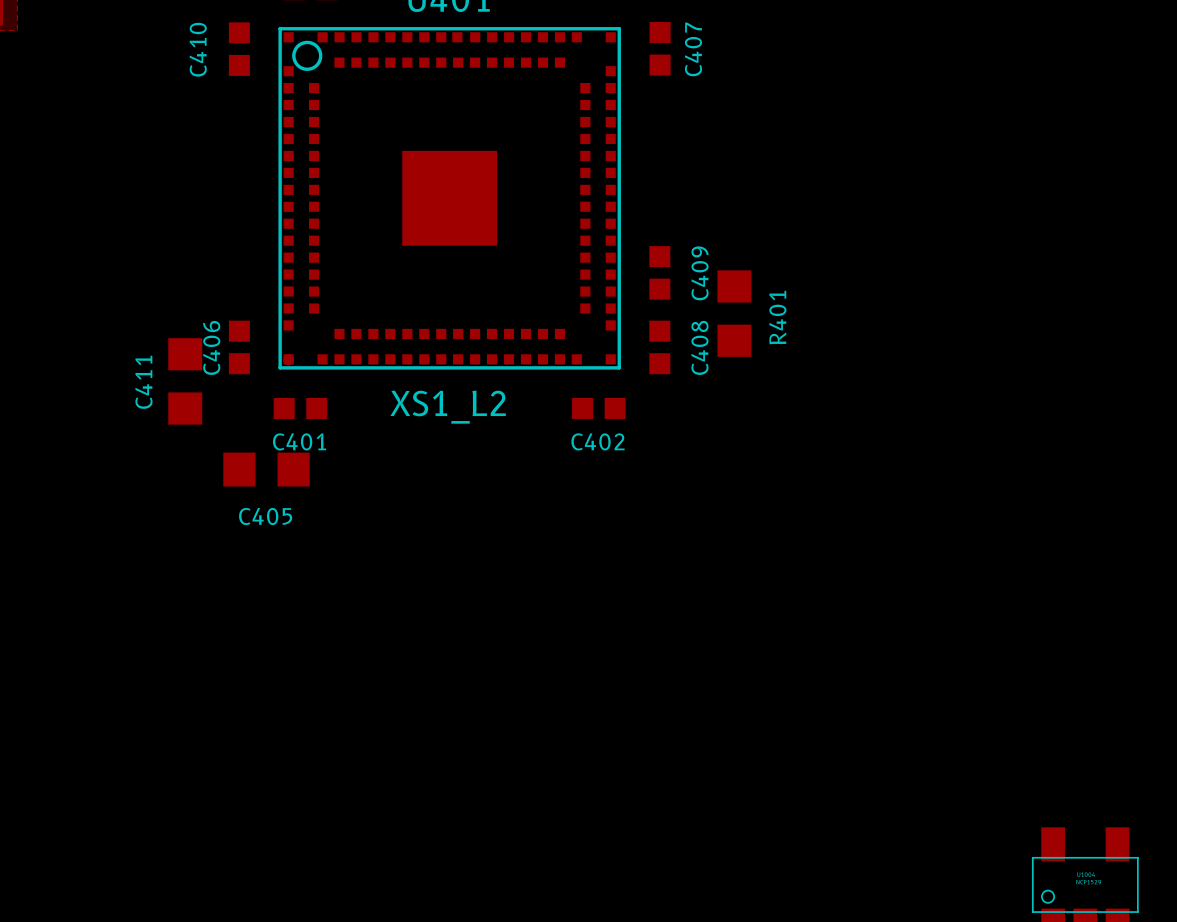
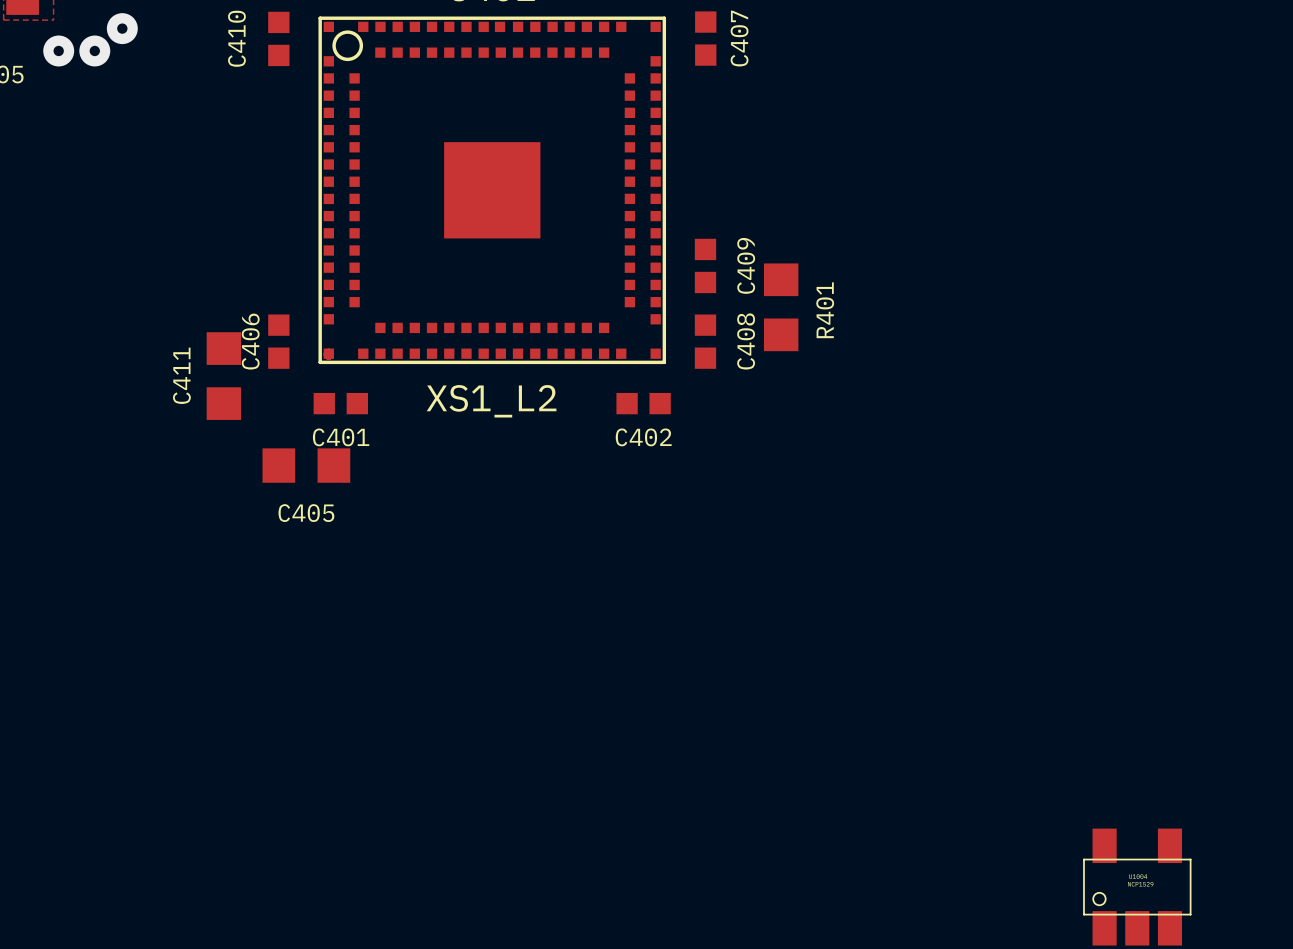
via: none -> (122, 28)
via: none -> (58, 50)
via: none -> (94, 50)

